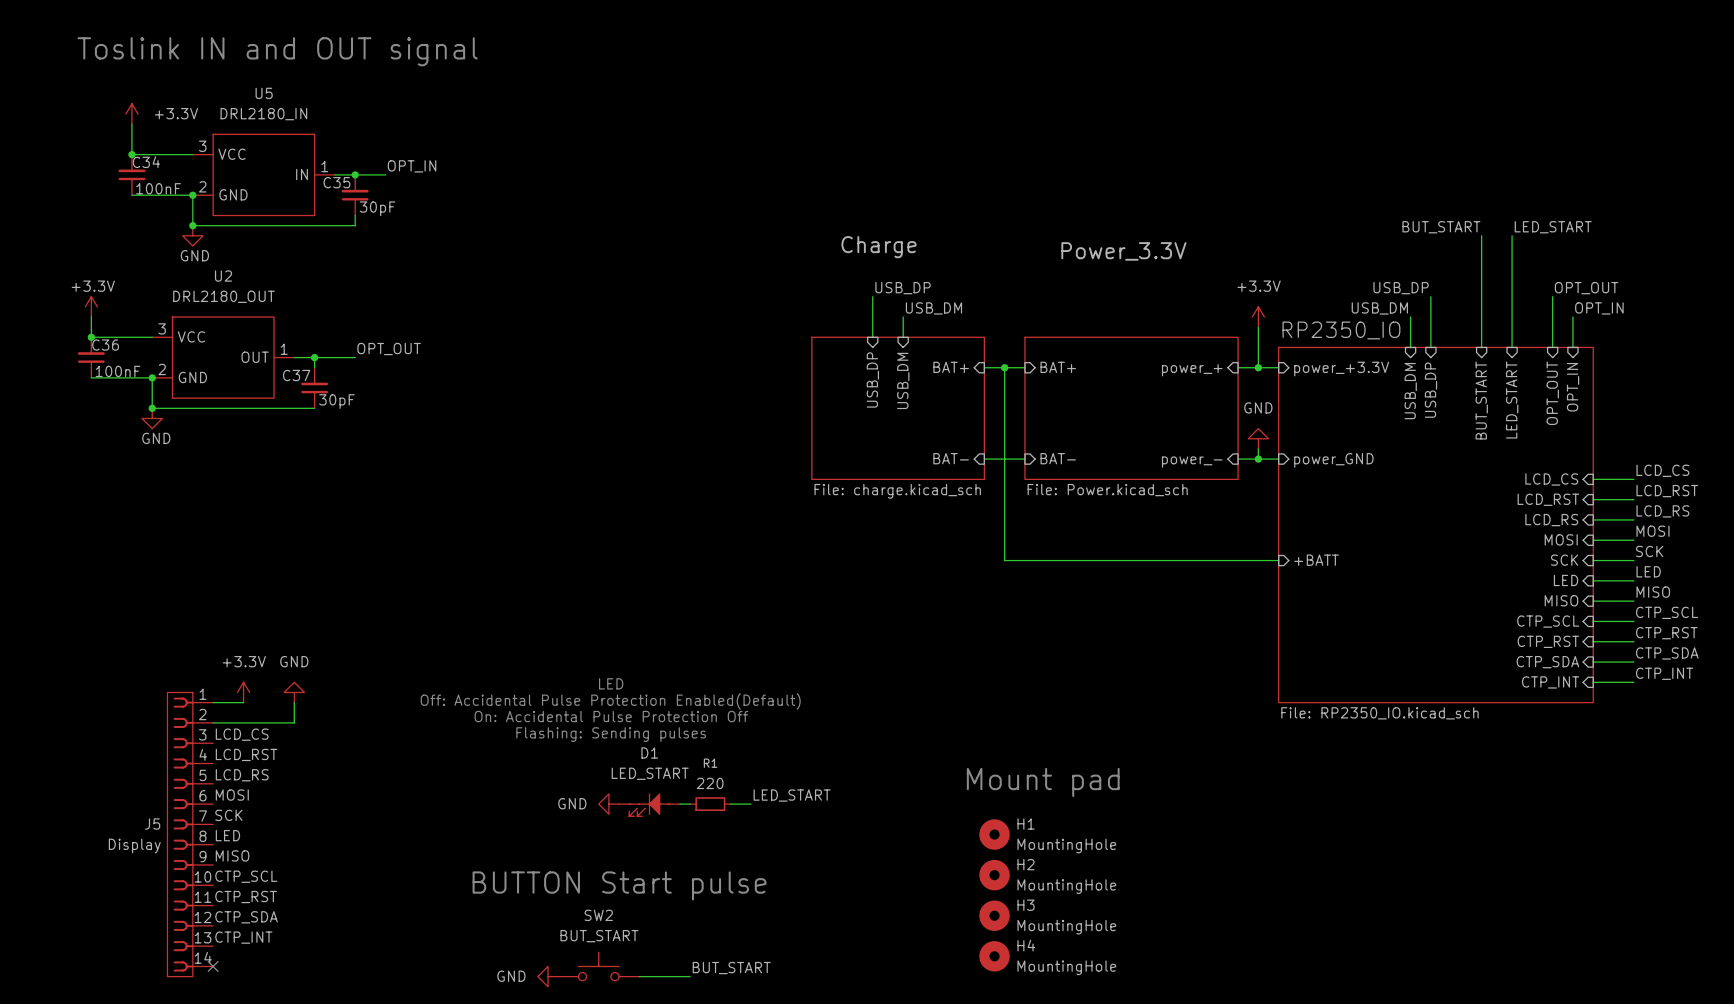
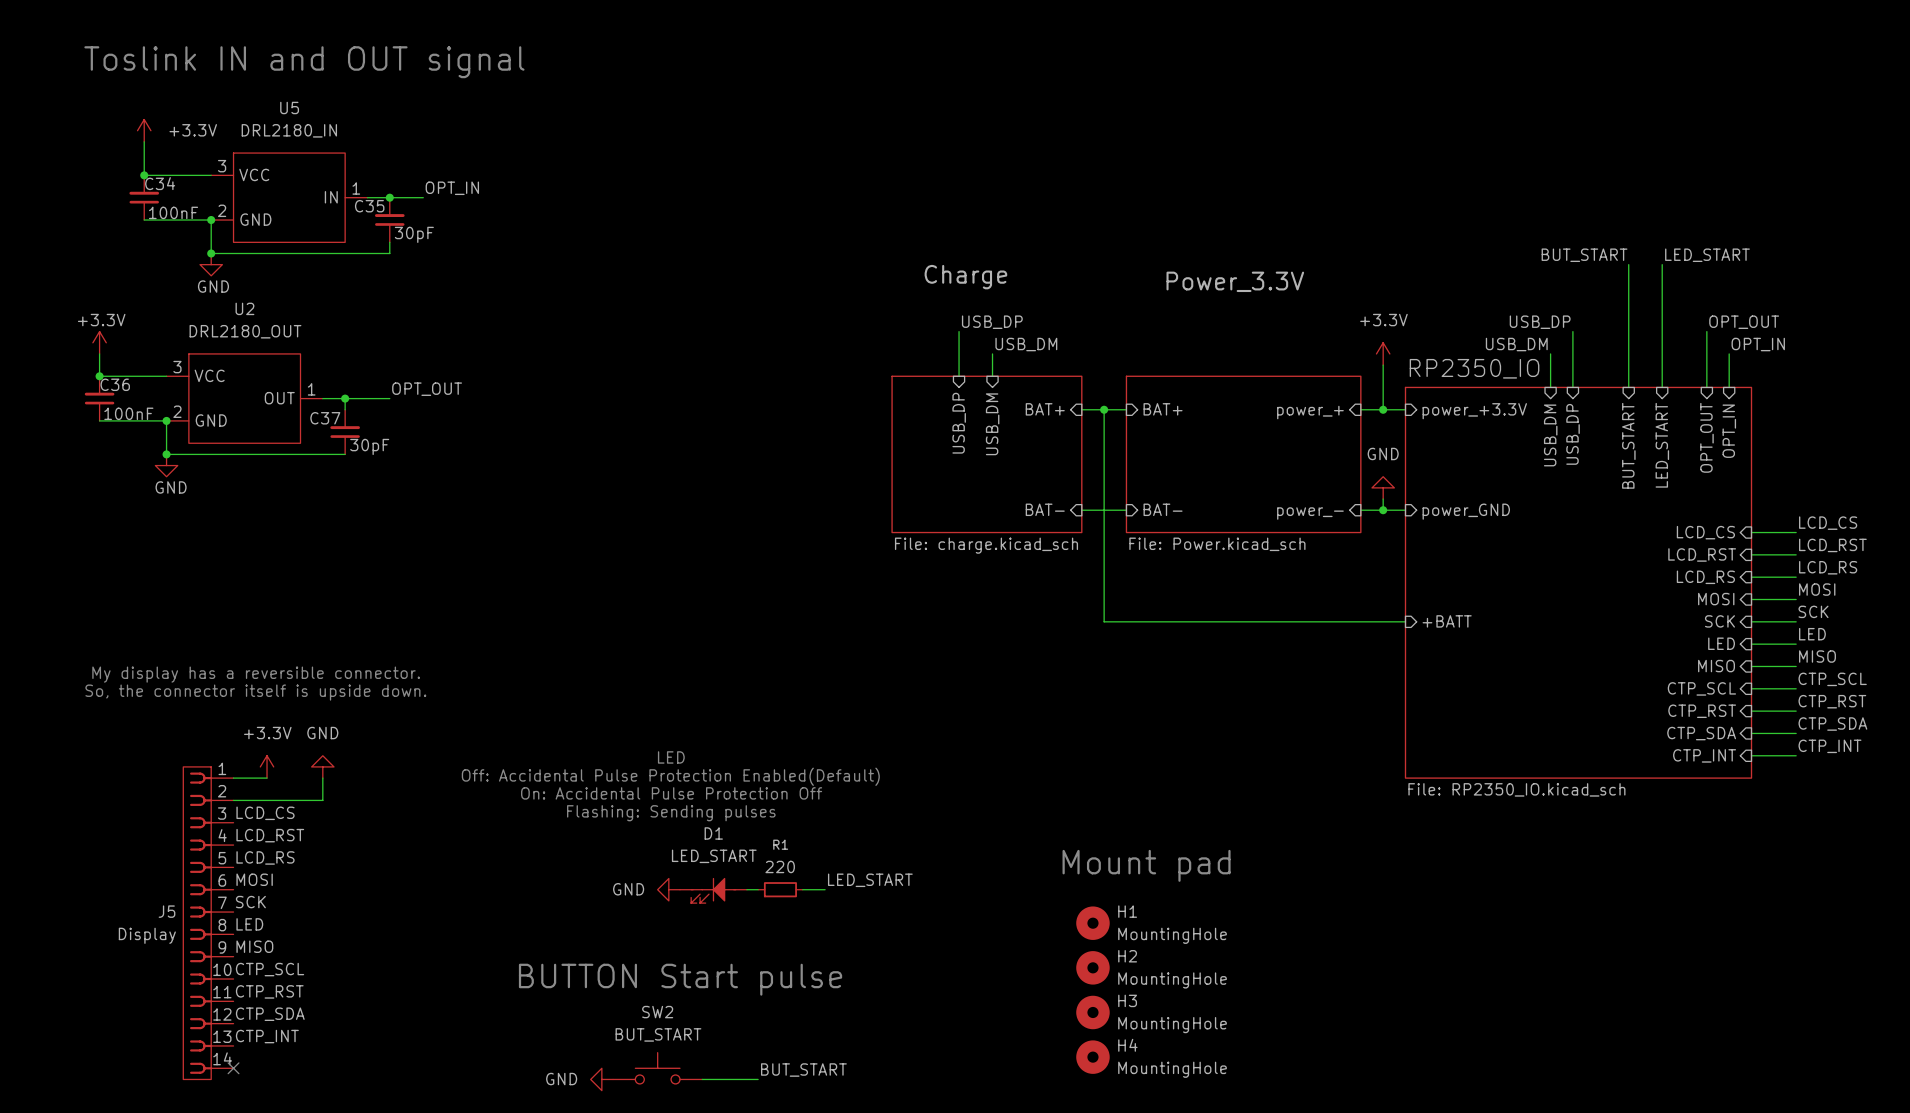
text: none -> My display has a reversible connector. (256, 674)
text: none -> So, the connector itself is upside down. (255, 692)

